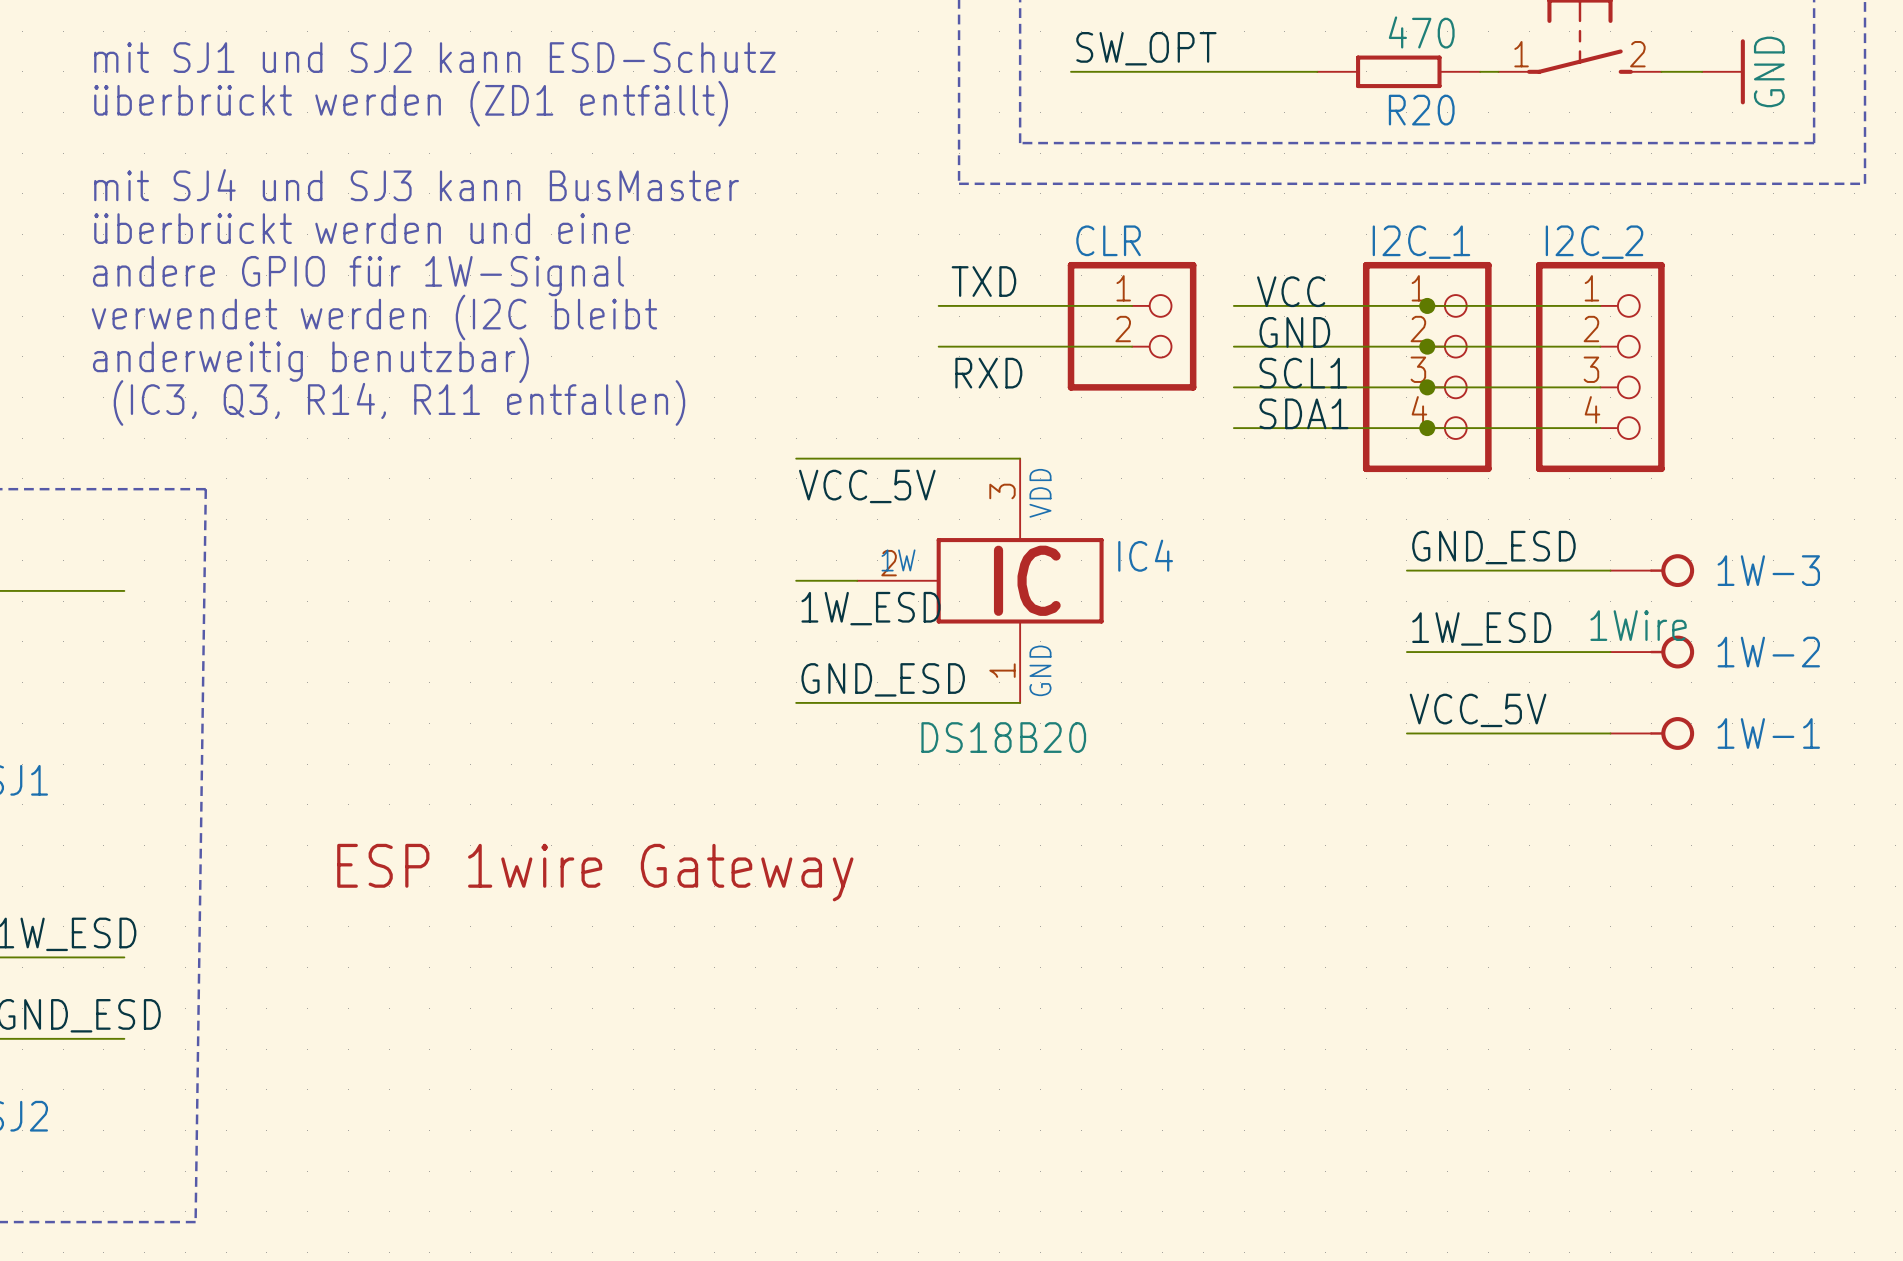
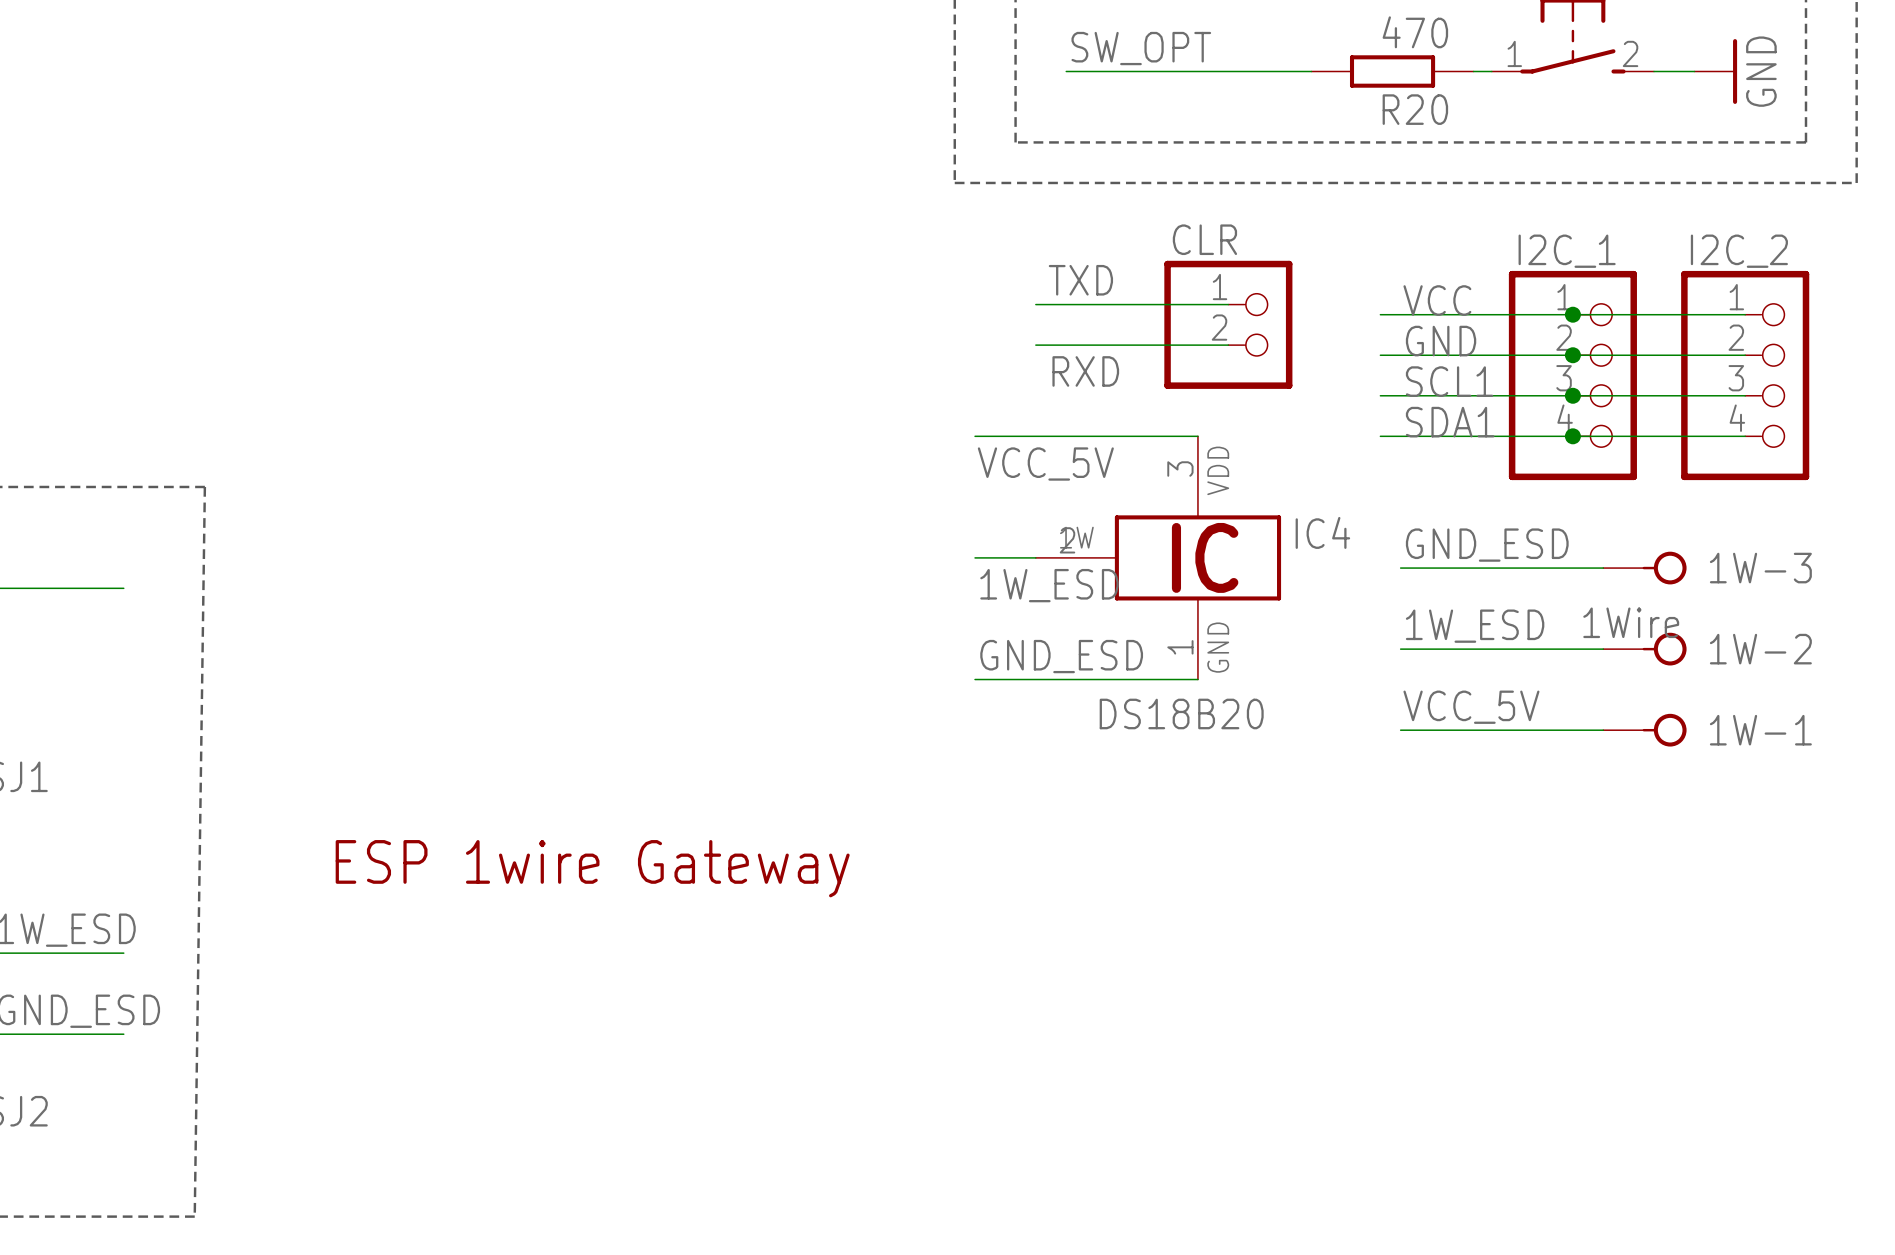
text: mit SJ1 und SJ2 kann ESD-Schutz (434, 57) -> none
text: überbrückt werden (ZD1 entfällt) (411, 103) -> none
text: mit SJ4 und SJ3 kann BusMaster (416, 185) -> none
text: überbrückt werden und eine (362, 228) -> none
text: andere GPIO für 1W-Signal (358, 276) -> none
label position: TXD (983, 281) -> TXD (1080, 280)
label position: VCC (1291, 291) -> VCC (1437, 300)
wire: (938, 305) (1040, 305) -> none
wire: (1233, 305) (1600, 305) -> (1228, 304) (1127, 304)
junction: (1427, 305) -> none
wire: none -> (1380, 314) (1745, 314)
junction: none -> (1572, 314)
text: verwendet werden (I2C bleibt (374, 317) -> none
CLR position: (1132, 326) -> (1228, 324)
label position: GND (1294, 332) -> GND (1441, 341)
wire: (938, 346) (1040, 346) -> none
wire: (1233, 346) (1600, 346) -> (1228, 345) (1127, 345)
junction: (1427, 346) -> none
wire: none -> (1380, 355) (1745, 355)
junction: none -> (1572, 355)
text: anderweitig benutzbar) (310, 360) -> none
I2C_1 position: (1427, 367) -> (1572, 375)
I2C_2 position: (1600, 367) -> (1745, 375)
label position: RXD (988, 373) -> RXD (1085, 371)
label position: SCL1 (1303, 373) -> SCL1 (1449, 381)
wire: (1233, 387) (1600, 387) -> (1380, 395) (1745, 395)
junction: (1427, 387) -> none
junction: none -> (1572, 395)
text: (IC3, Q3, R14, R11 entfallen) (399, 402) -> none
label position: SDA1 (1303, 413) -> SDA1 (1450, 422)
wire: (1233, 428) (1600, 428) -> (1380, 436) (1745, 436)
junction: (1427, 428) -> none
junction: none -> (1572, 436)
wire: (796, 458) (1020, 458) -> (975, 436) (1197, 436)
label position: VCC_5V (867, 486) -> VCC_5V (1045, 464)
wire: (796, 580) (857, 580) -> (975, 557) (1035, 557)
IC4 position: (980, 580) -> (1158, 557)
label position: 1W_ESD (870, 608) -> 1W_ESD (1049, 585)
label position: GND_ESD (883, 679) -> GND_ESD (1061, 656)
wire: (796, 702) (1020, 702) -> (975, 679) (1197, 679)

